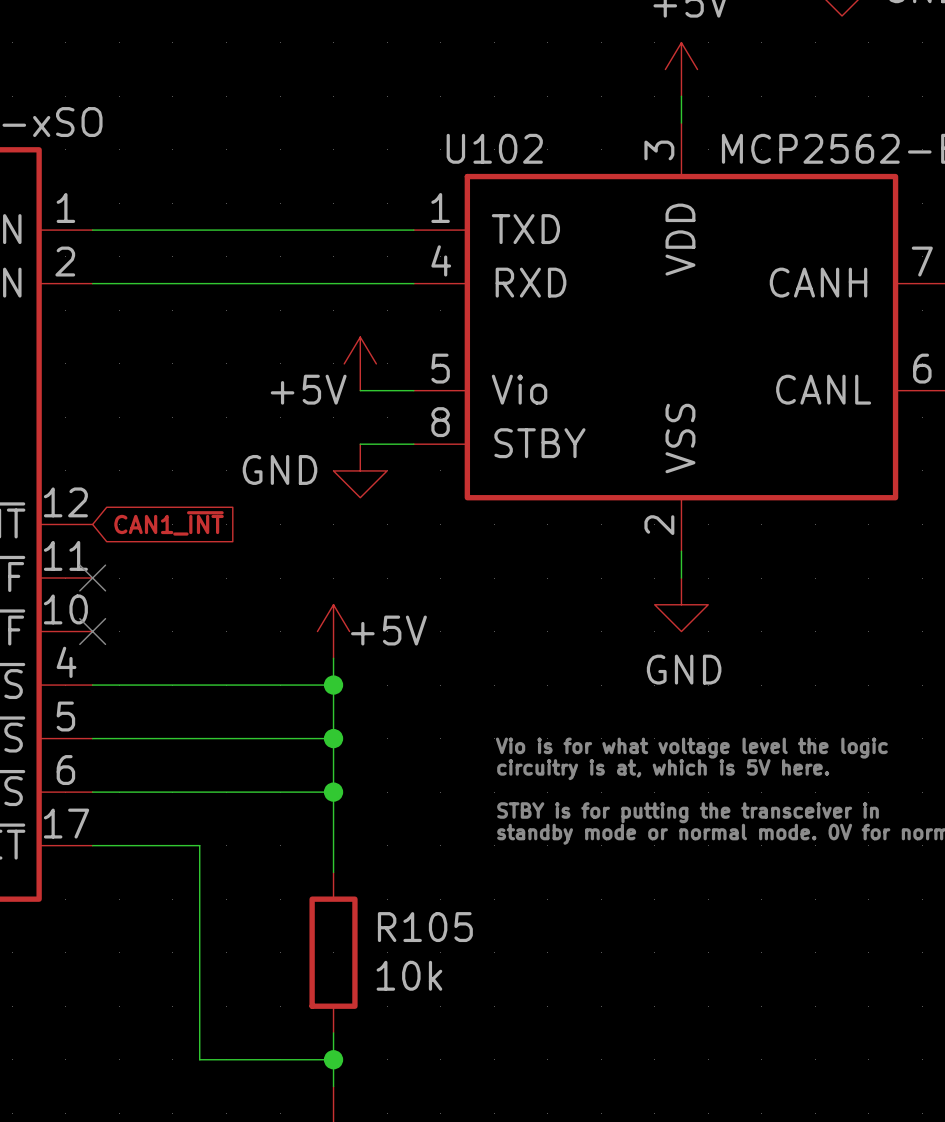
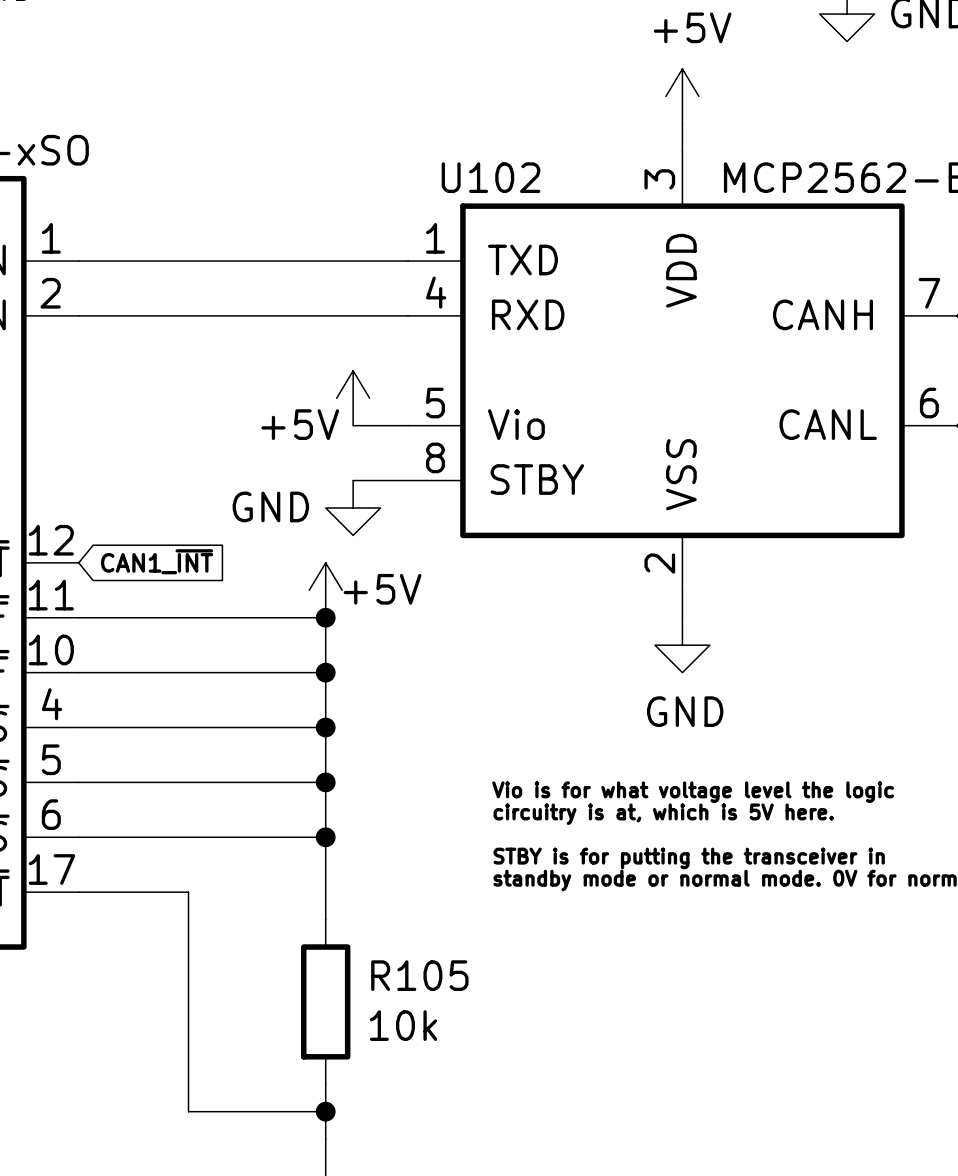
wire: none -> (78, 617) (325, 617) (325, 700)
no-connect mark: (92, 578) -> none
junction: none -> (325, 617)
wire: none -> (78, 672) (325, 672)
no-connect mark: (92, 631) -> none
power symbol position: +5V (333, 631) -> +5V (325, 590)
junction: none -> (325, 672)

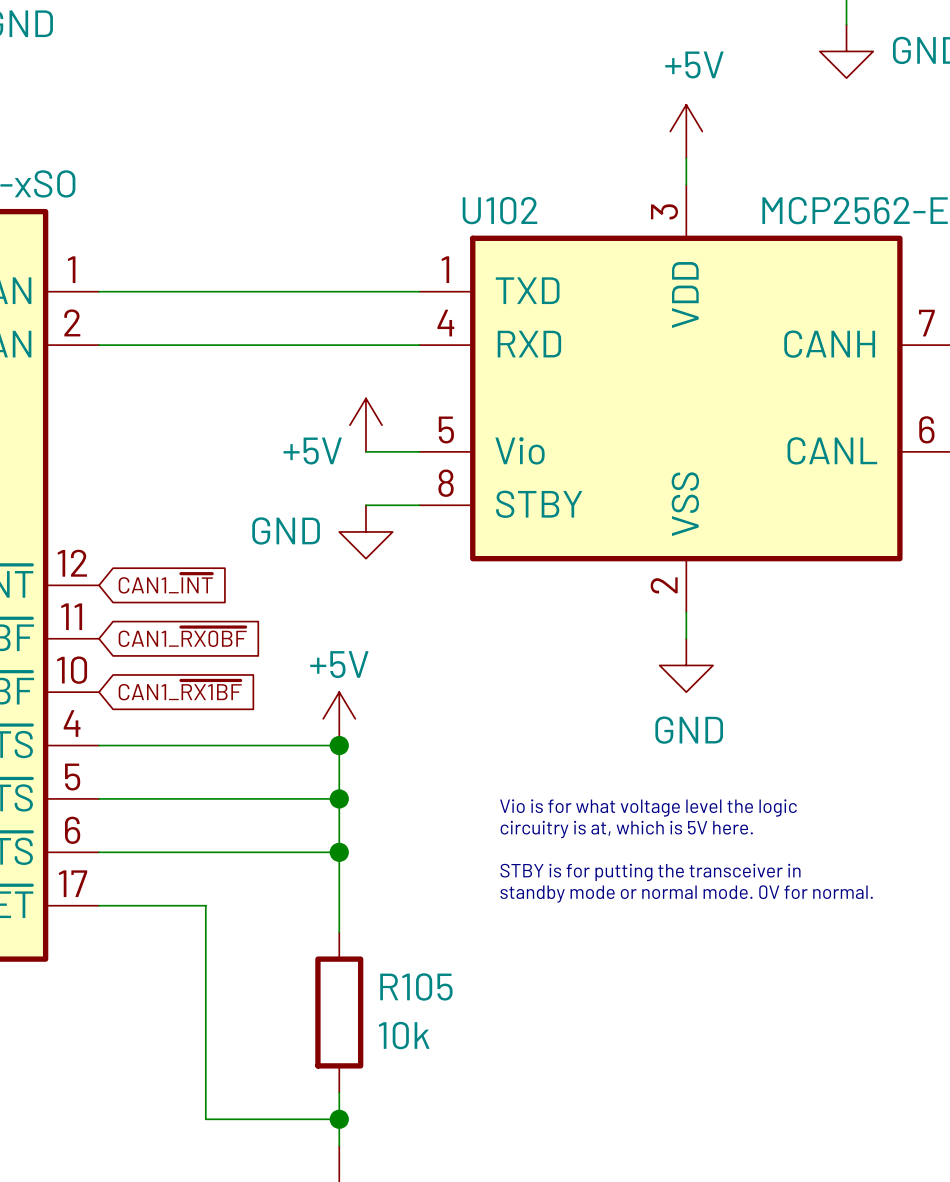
power symbol text position: +5V (382, 589) -> +5V (339, 664)
power symbol position: +5V (325, 590) -> +5V (339, 718)
global label: none -> CAN1_~{RX0BF} (182, 637)
wire: (78, 617) (325, 617) (325, 727) -> none
junction: (325, 617) -> none
global label: none -> CAN1_~{RX1BF} (180, 690)
wire: (78, 672) (325, 672) -> none
junction: (325, 672) -> none

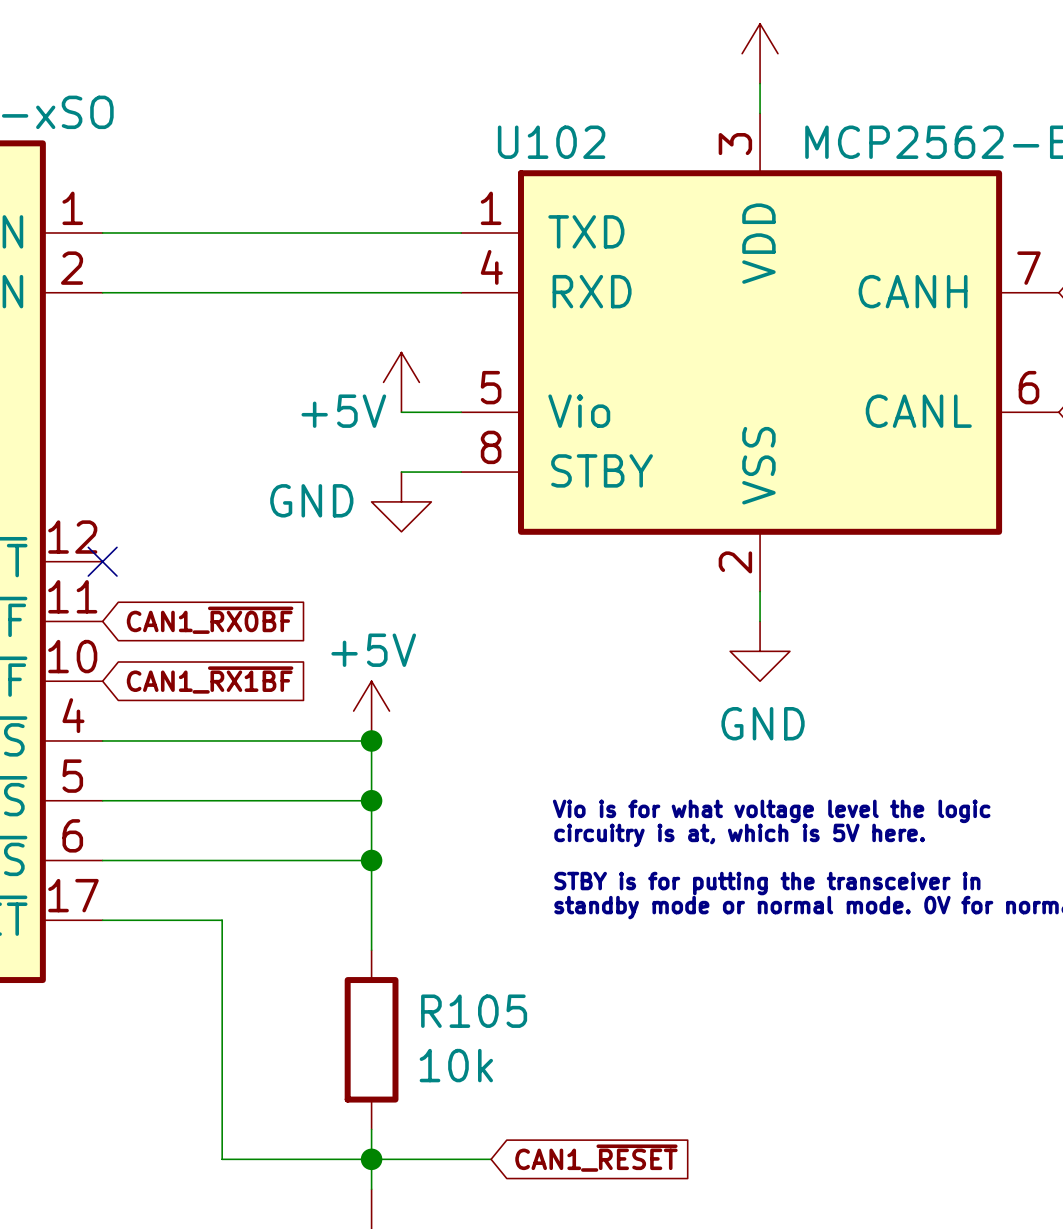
global label: CAN1_~{INT} (165, 583) -> none
no-connect mark: none -> (102, 561)
global label: none -> CAN1_~{RESET} (596, 1158)
wire: none -> (371, 1159) (491, 1159)

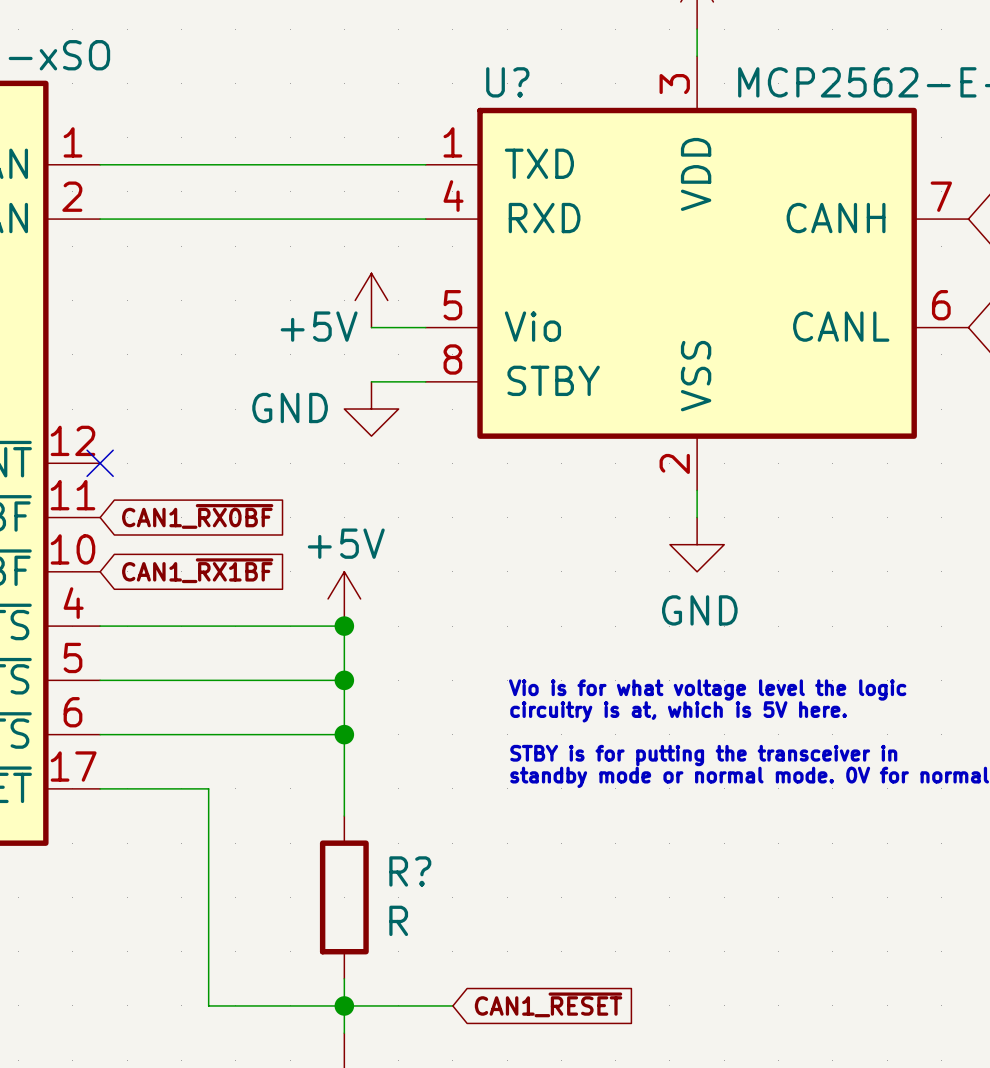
U102 name: U102 (551, 142) -> U? (507, 82)
R105 name: R105 (474, 1011) -> R? (410, 871)
R105 value: 10k (456, 1065) -> R (398, 920)

